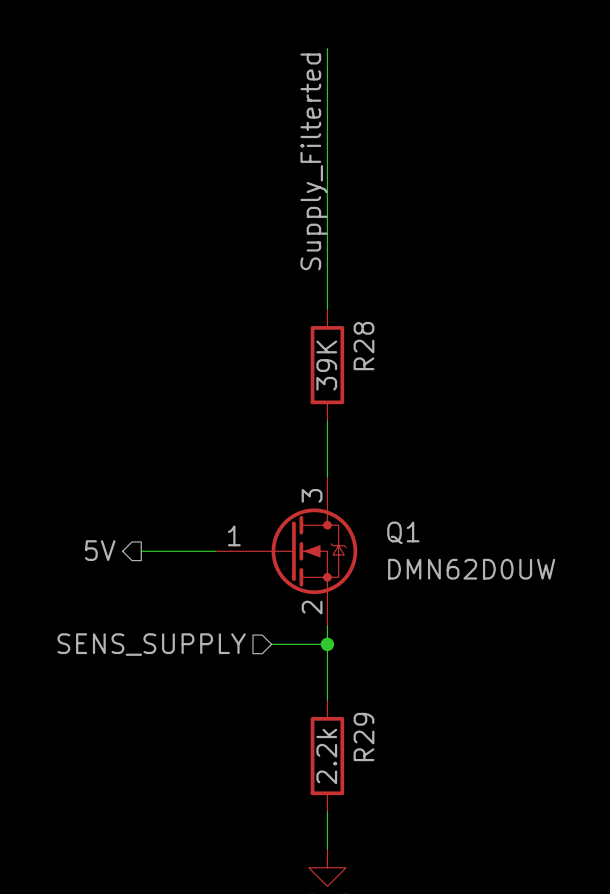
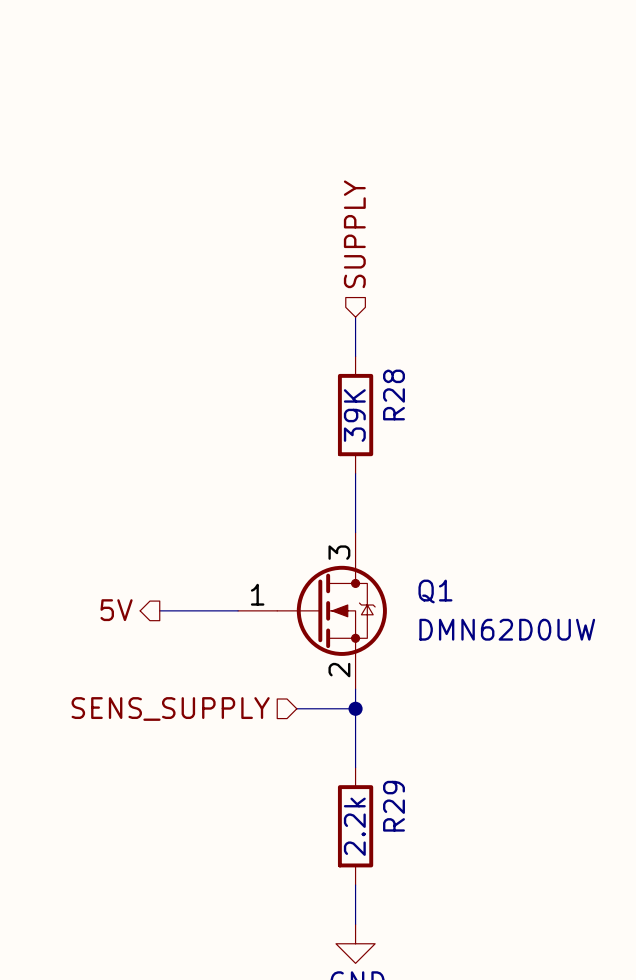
wire: (327, 48) (327, 272) -> none
label: Supply_Filterted (313, 161) -> none
hierarchical label: none -> SUPPLY (354, 234)

